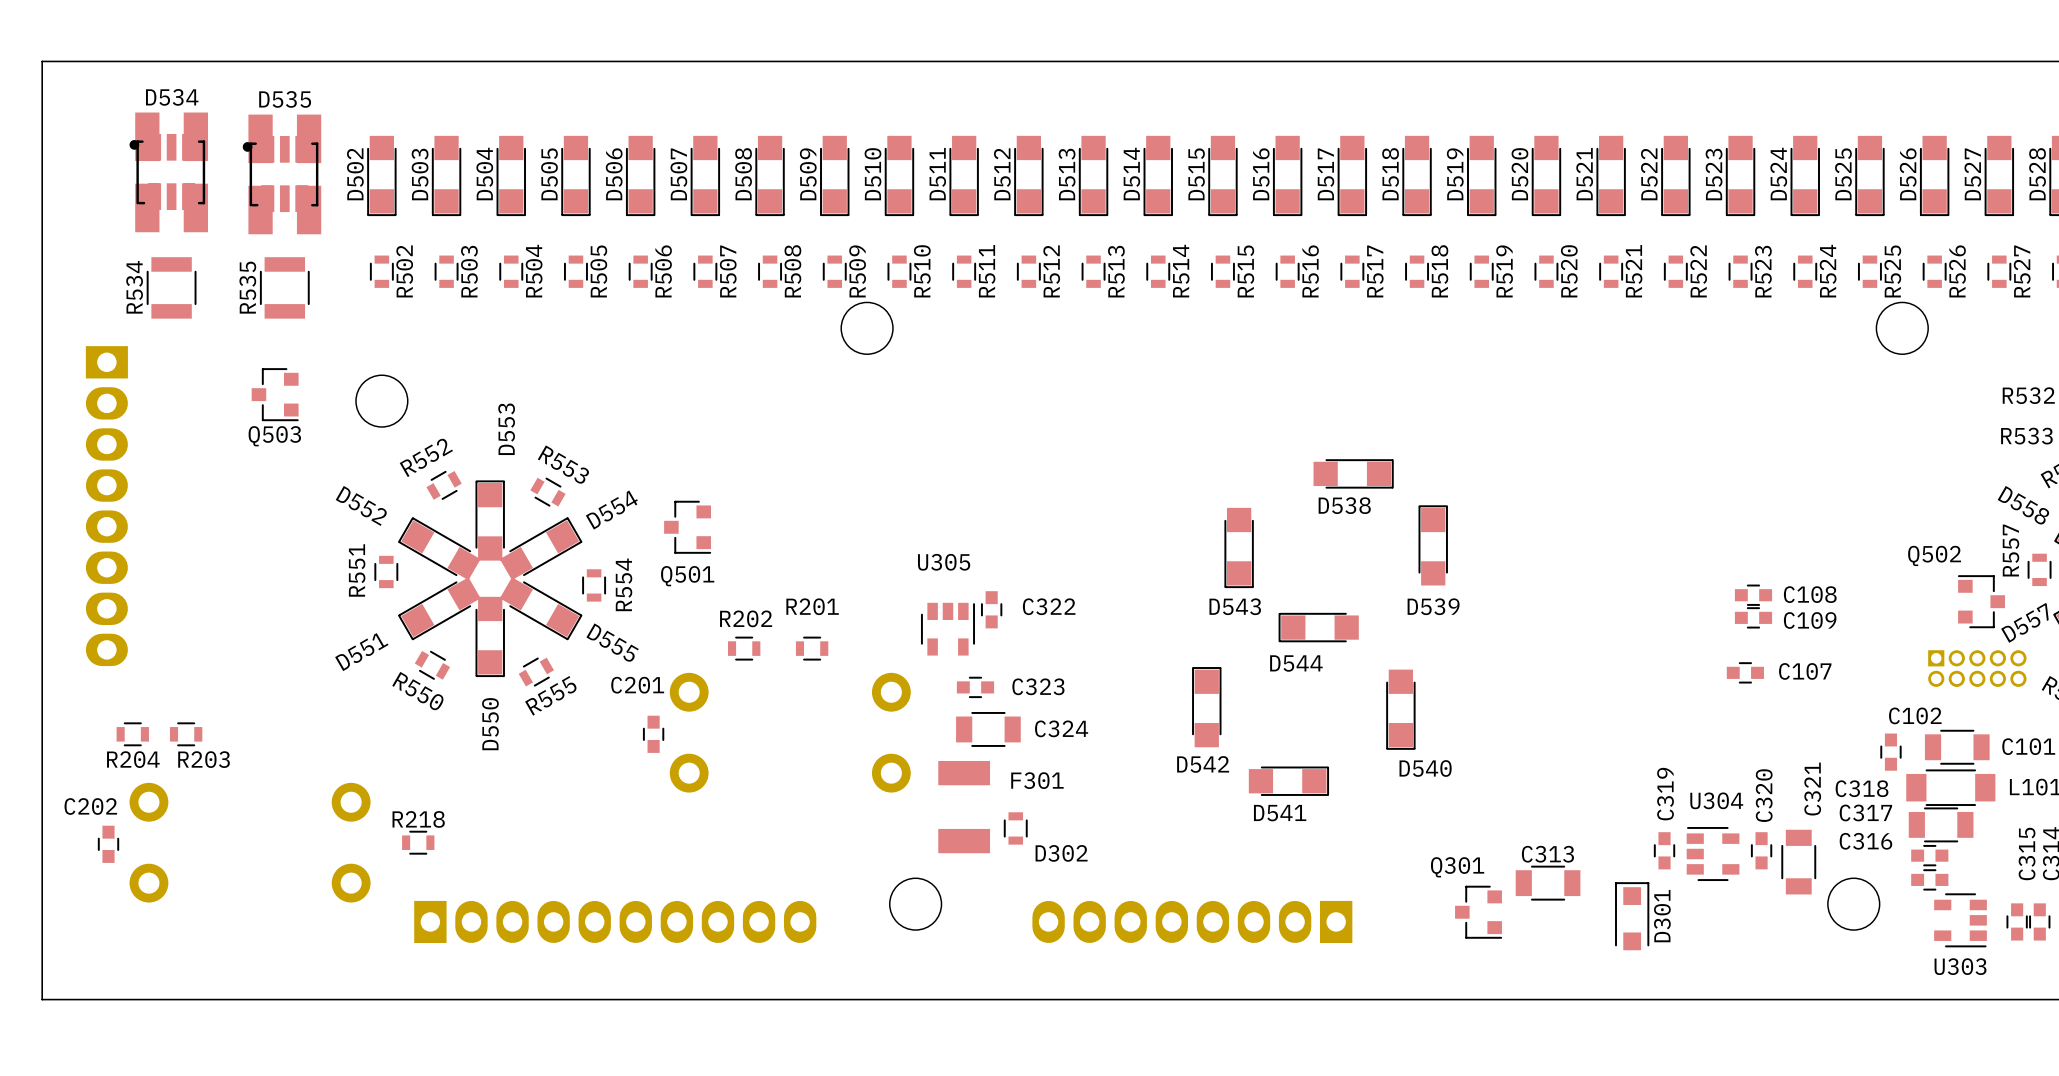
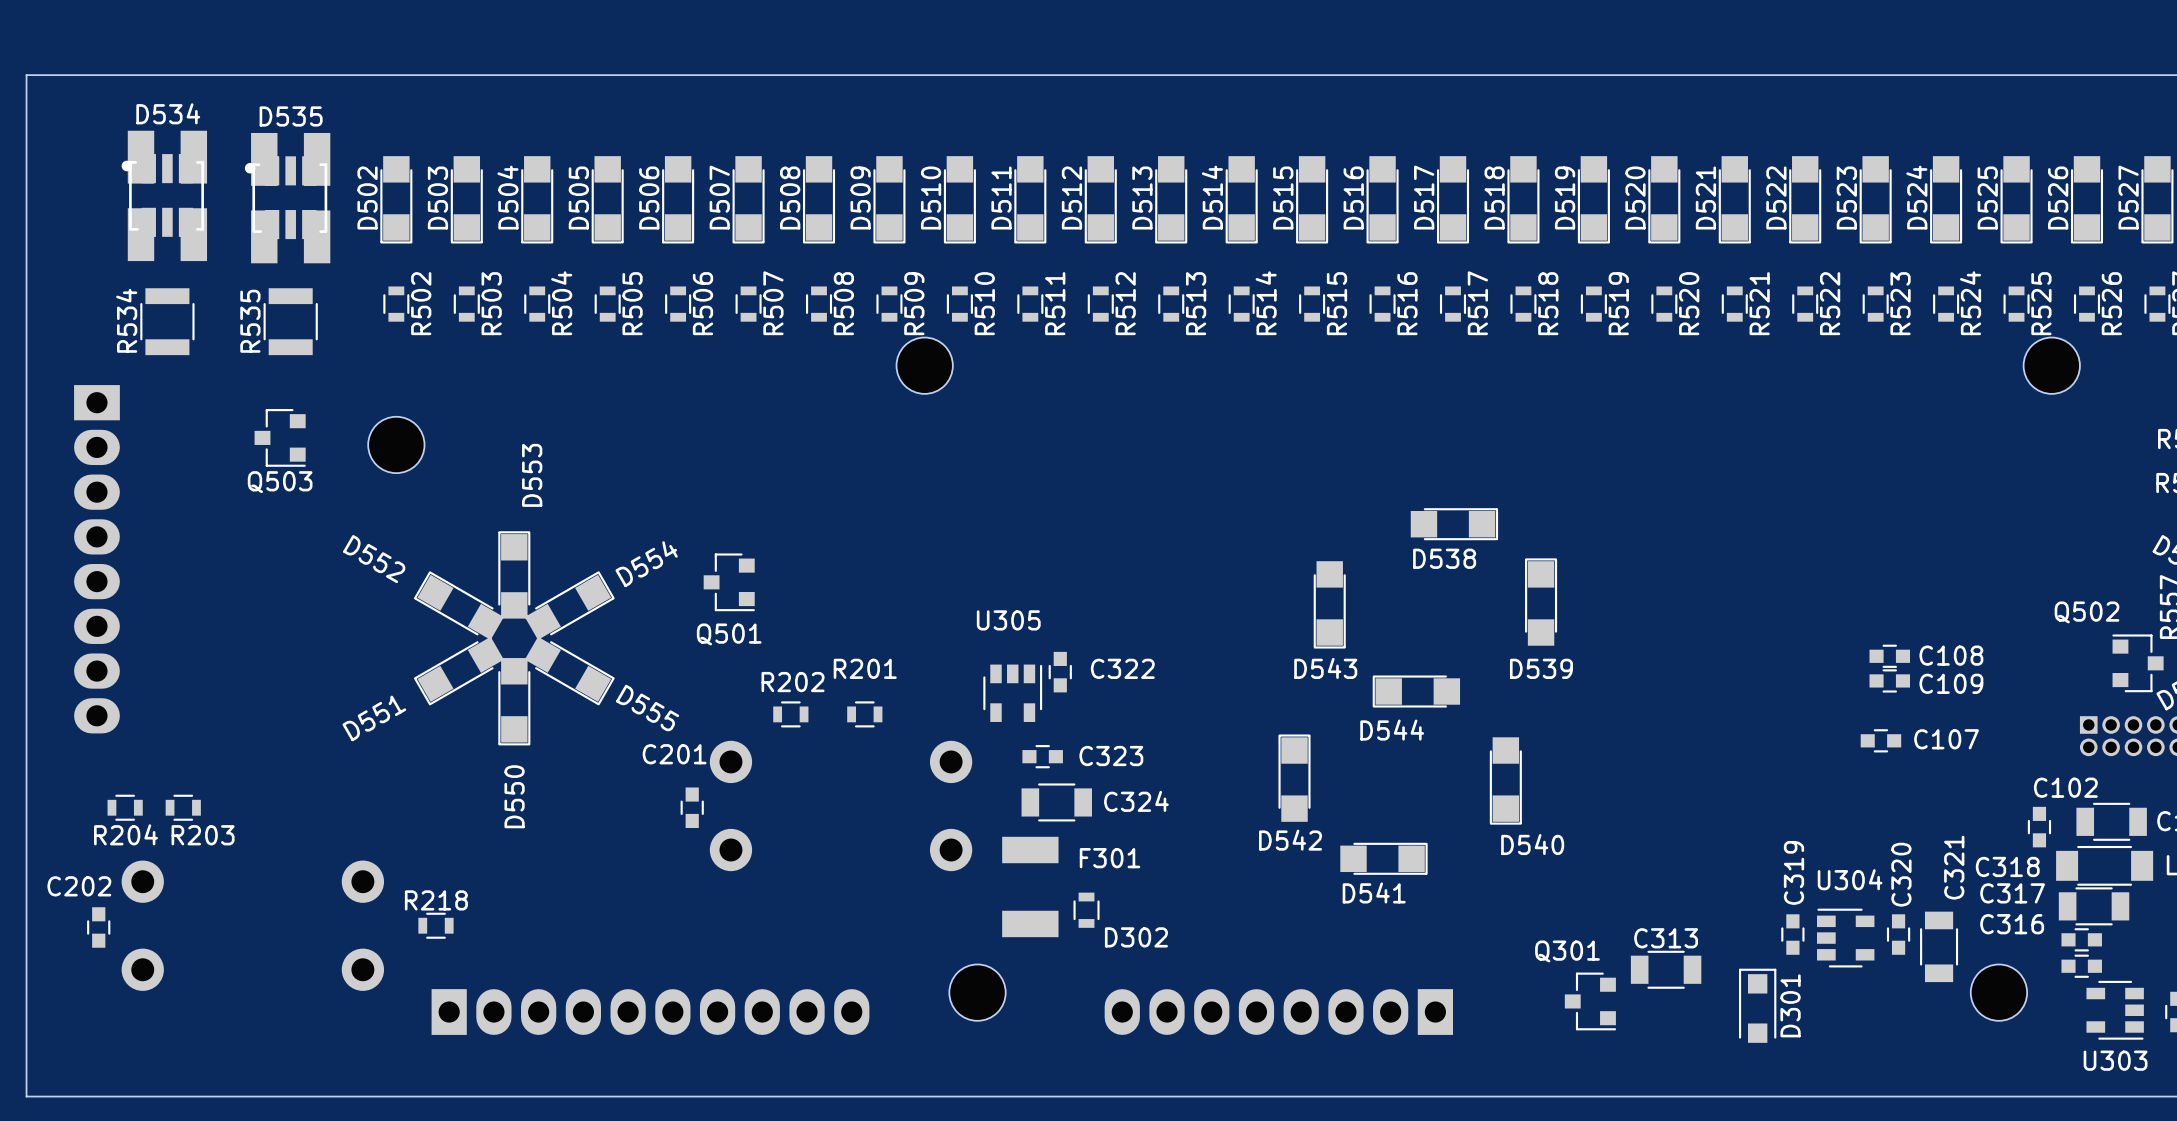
R552: (444, 485) -> none
R553: (547, 492) -> none
R551: (386, 571) -> none
R554: (594, 585) -> none
R550: (432, 665) -> none
R555: (536, 672) -> none

